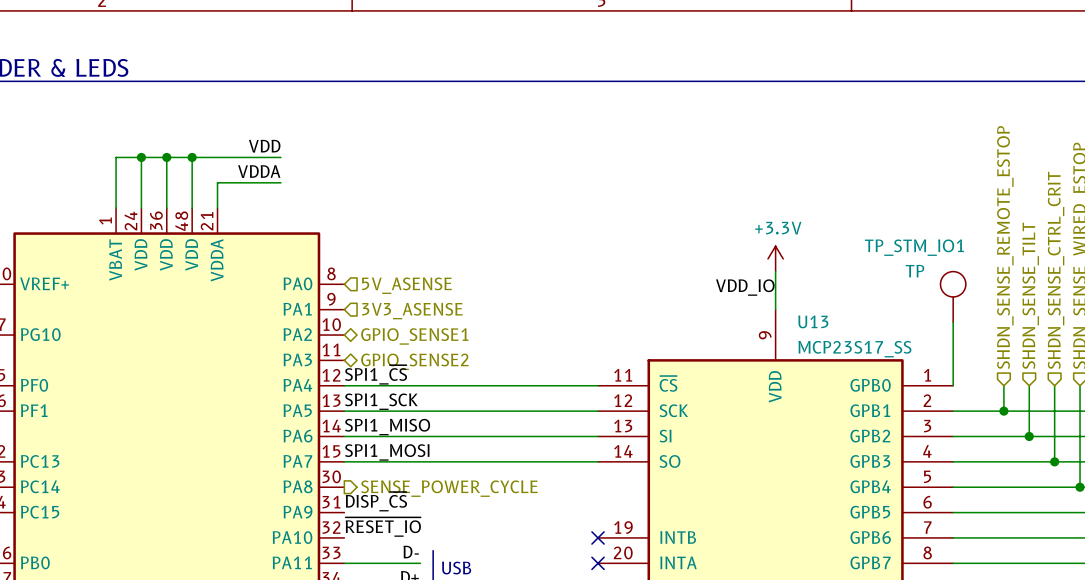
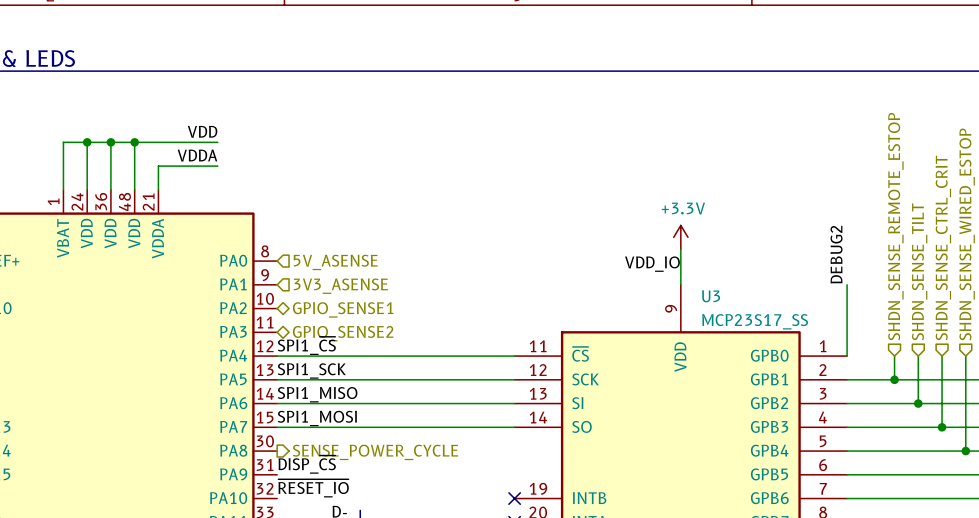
label: none -> DEBUG2 (836, 254)
TP_STM_IO1: TP (953, 296) -> none
U13 name: U13 (813, 321) -> U3 (711, 296)

